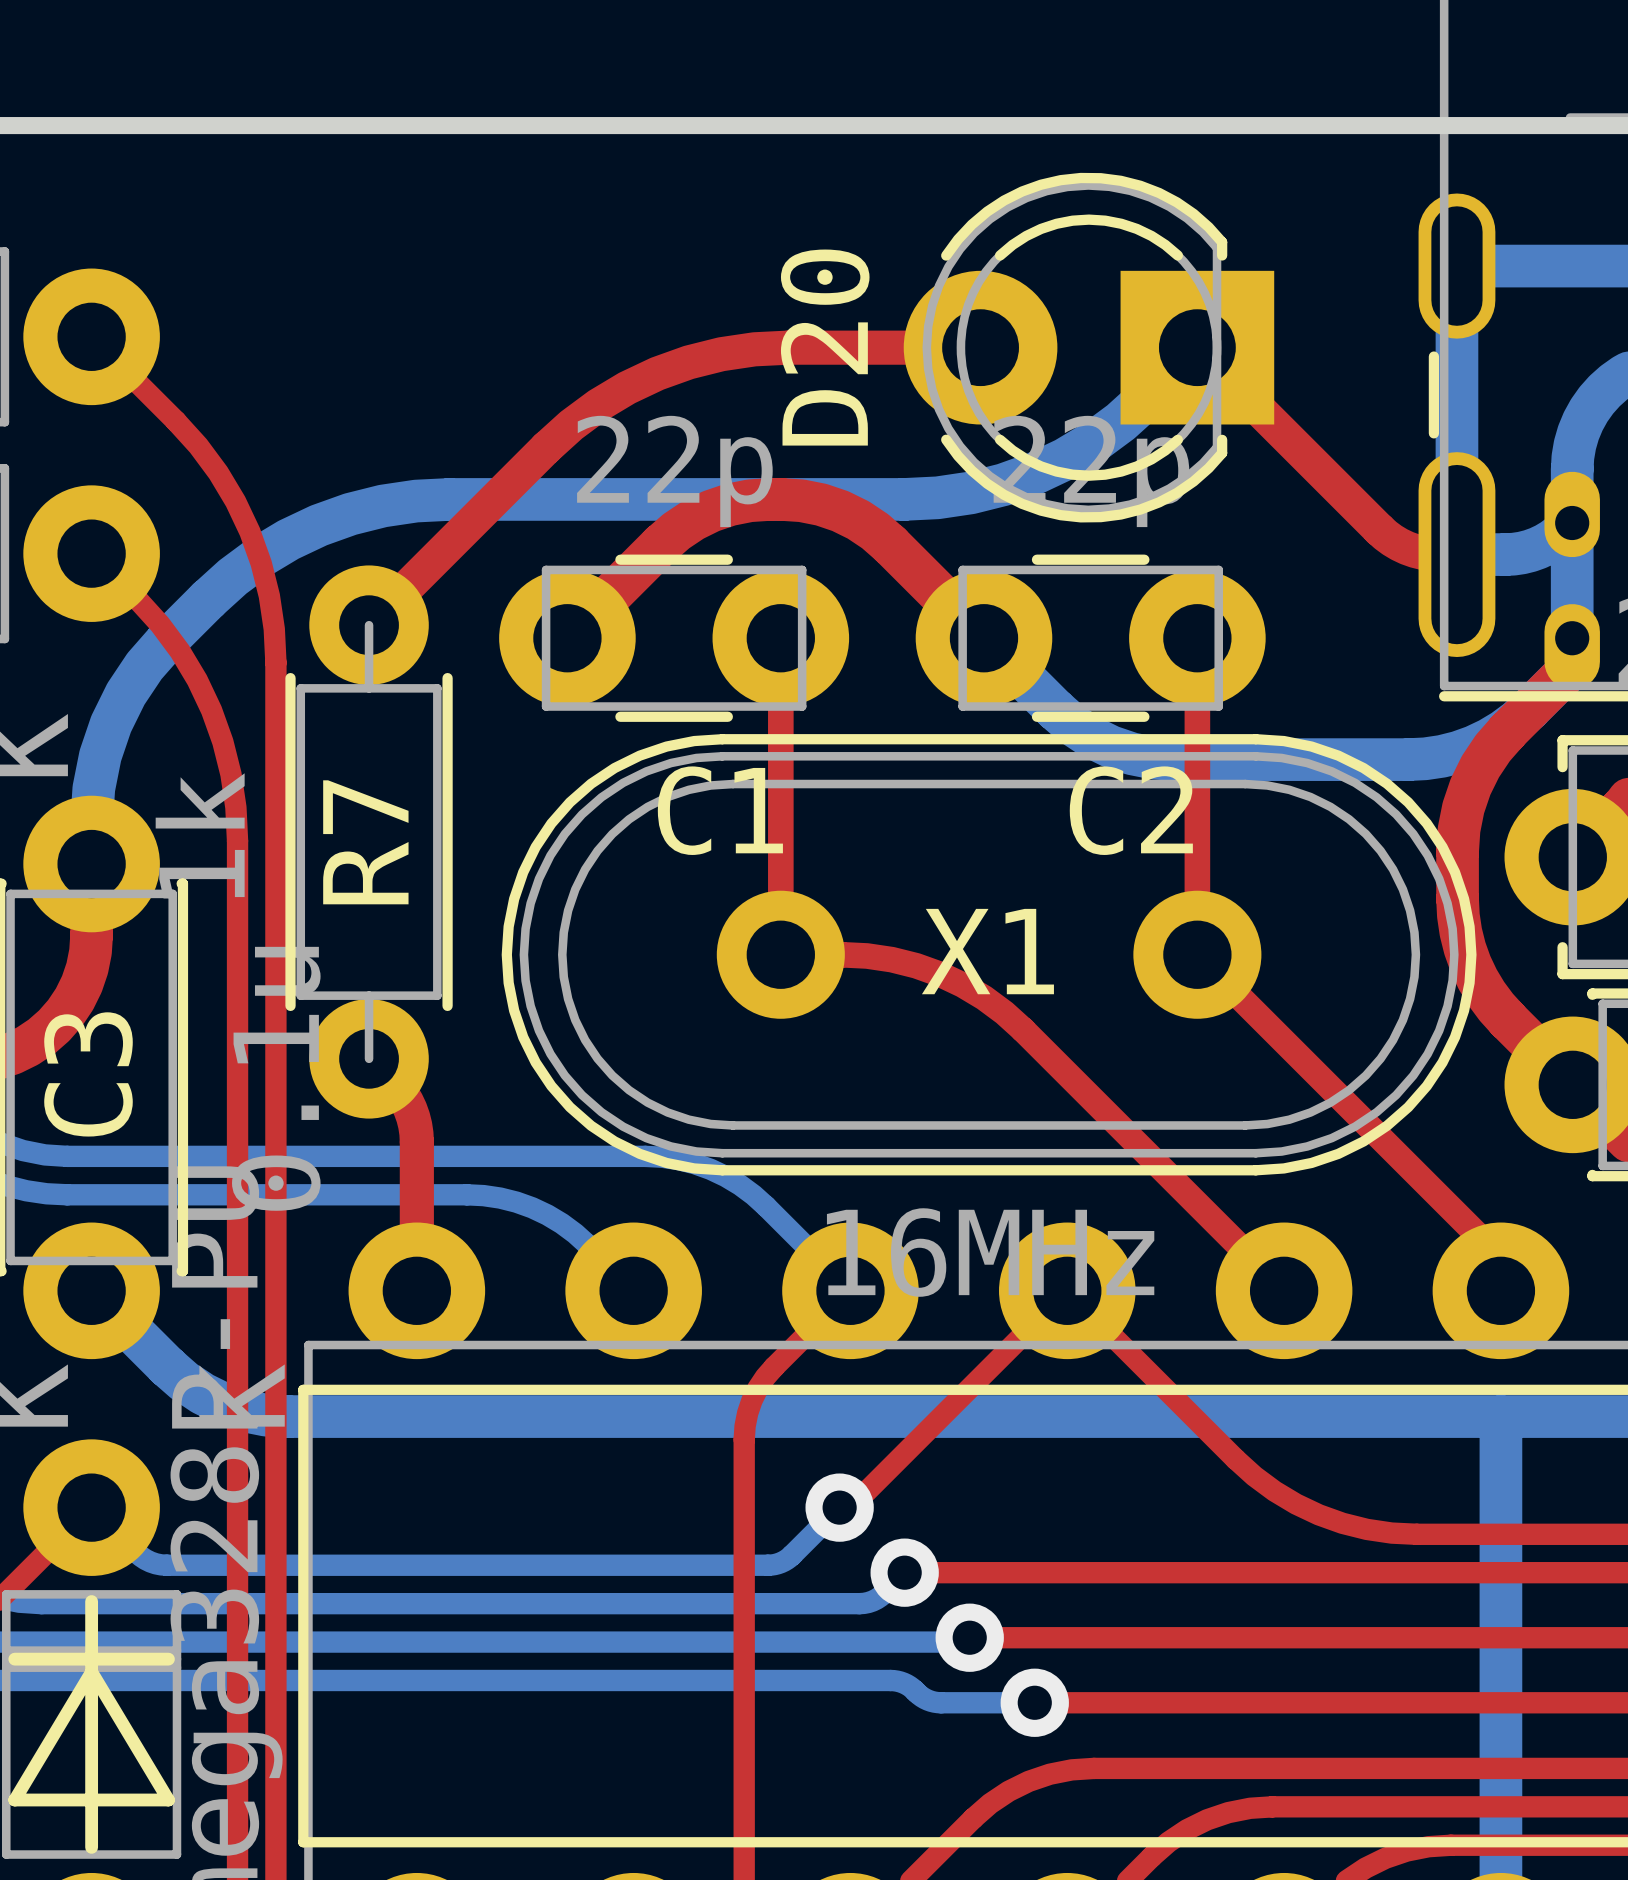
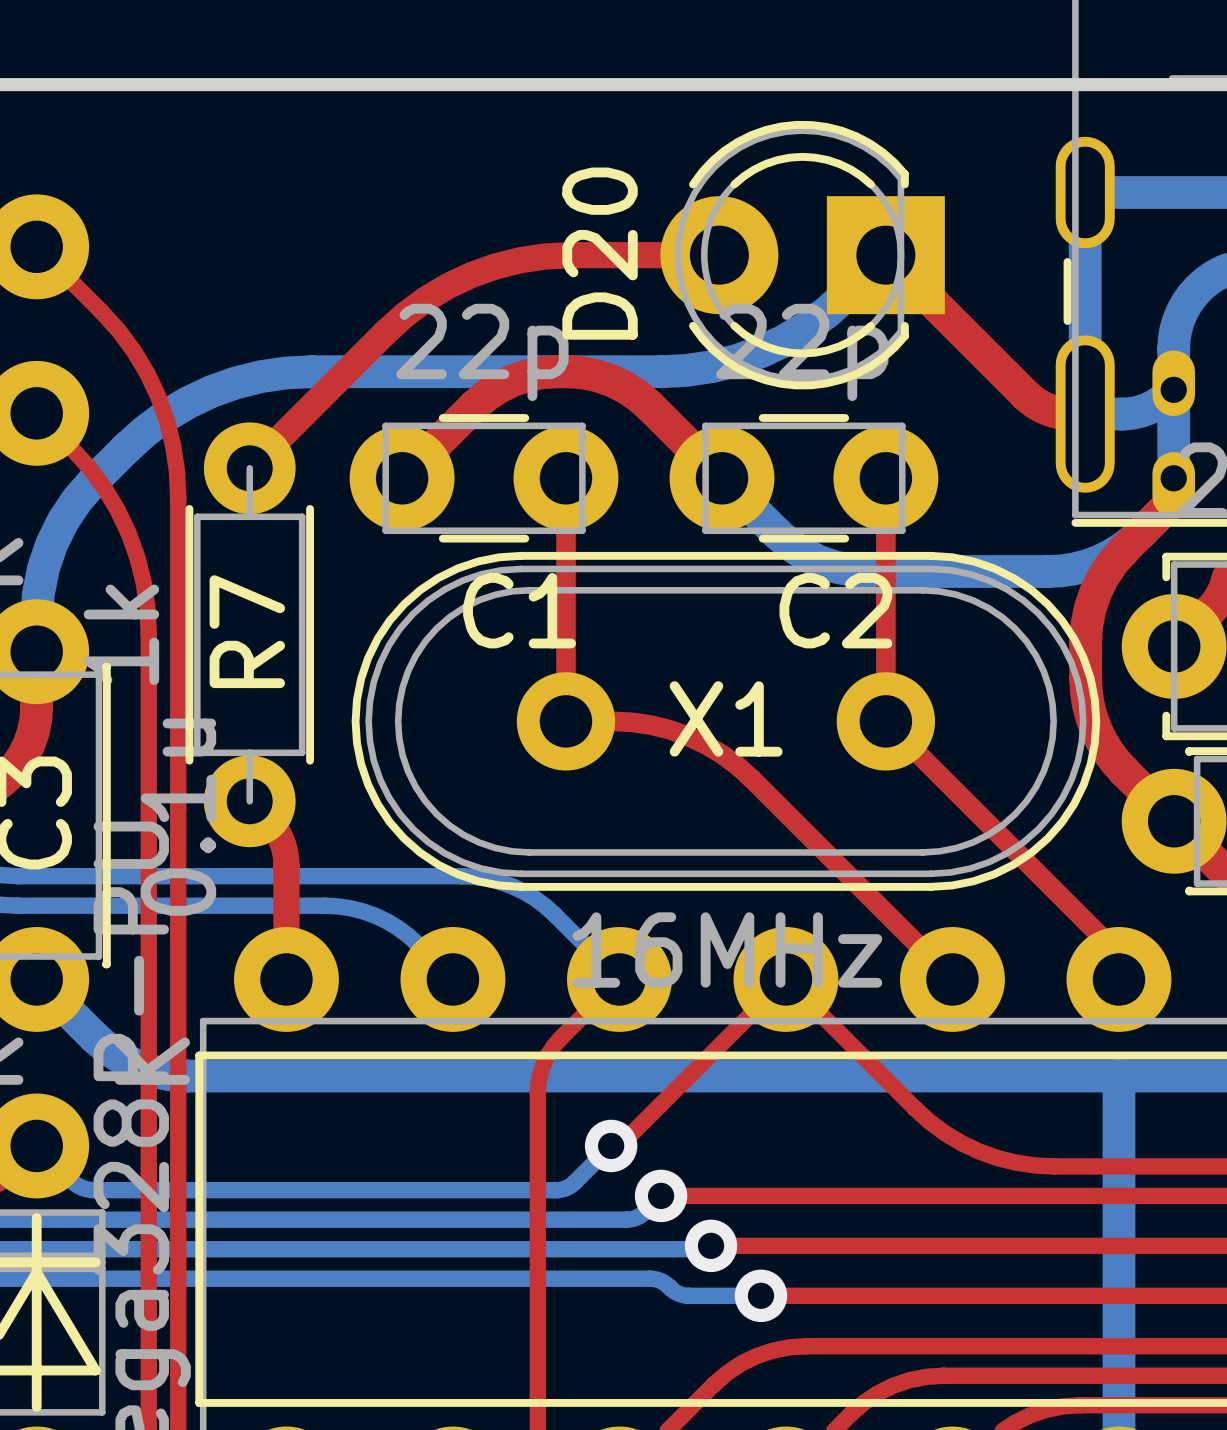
top track width: thin (1197, 347) (1385, 535) (1399, 544) (1414, 550) (1431, 554) (1456, 554) -> thick (885, 255) (1030, 399) (1052, 411) (1085, 414)

